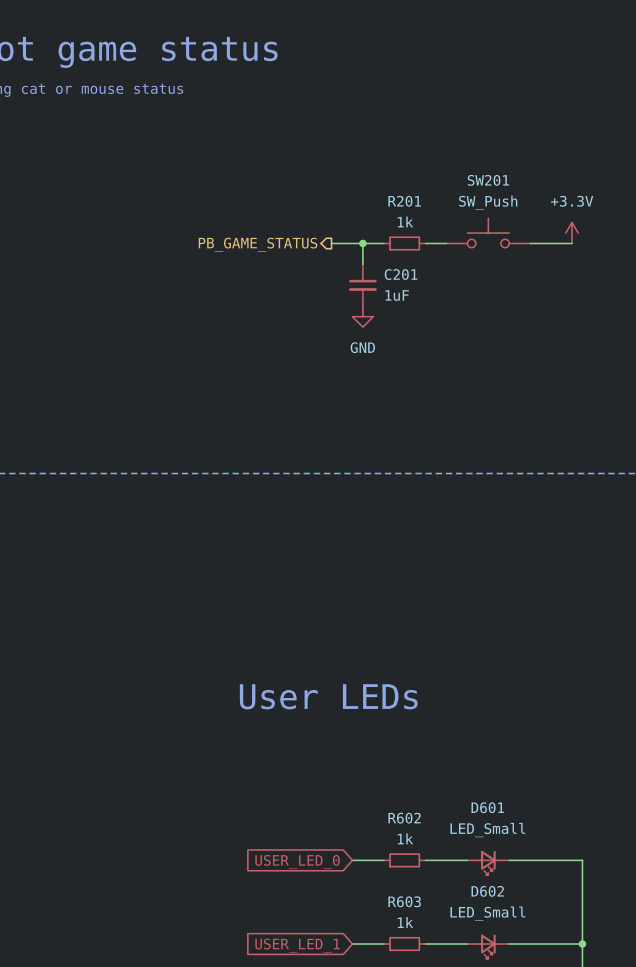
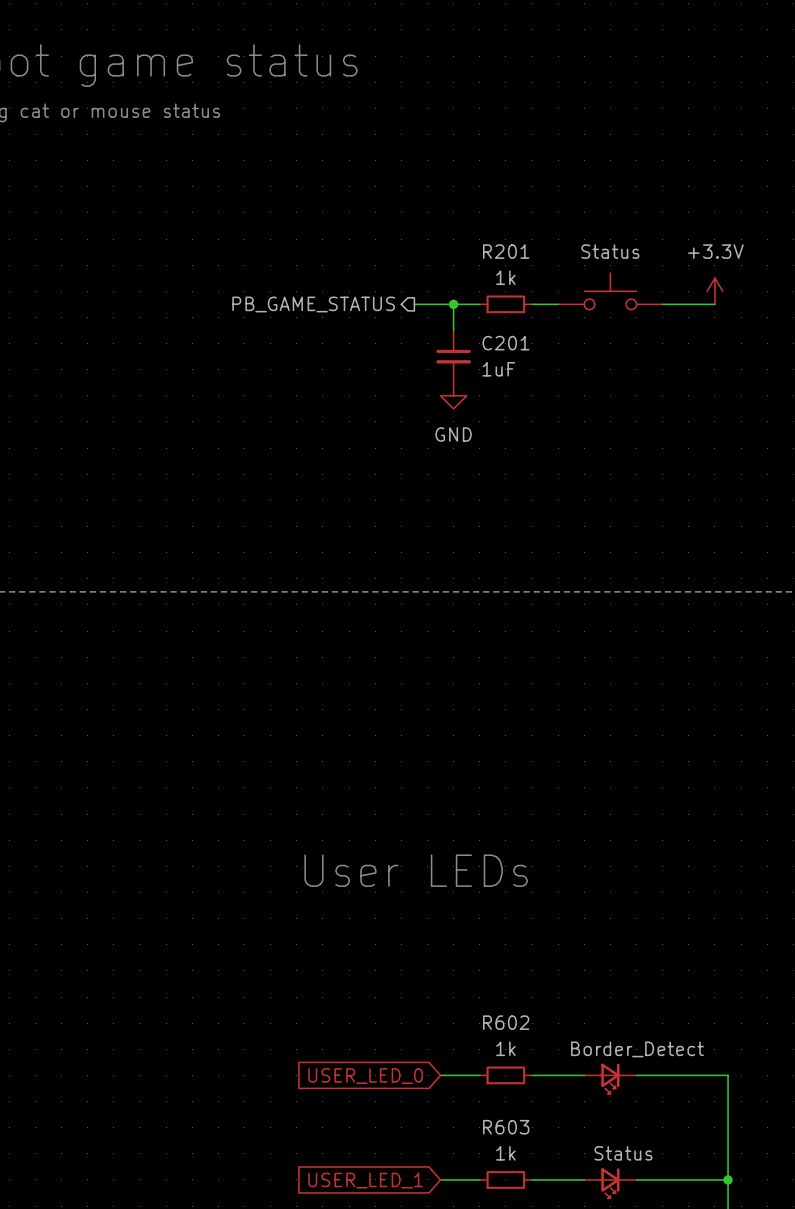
SW201 name: SW201 (488, 180) -> none
SW201 value: SW_Push (488, 202) -> Status (610, 251)
D601 name: D601 (487, 807) -> none
D601 value: LED_Small (487, 830) -> Border_Detect (637, 1049)
D602 name: D602 (487, 891) -> none
D602 value: LED_Small (487, 913) -> Status (623, 1153)

